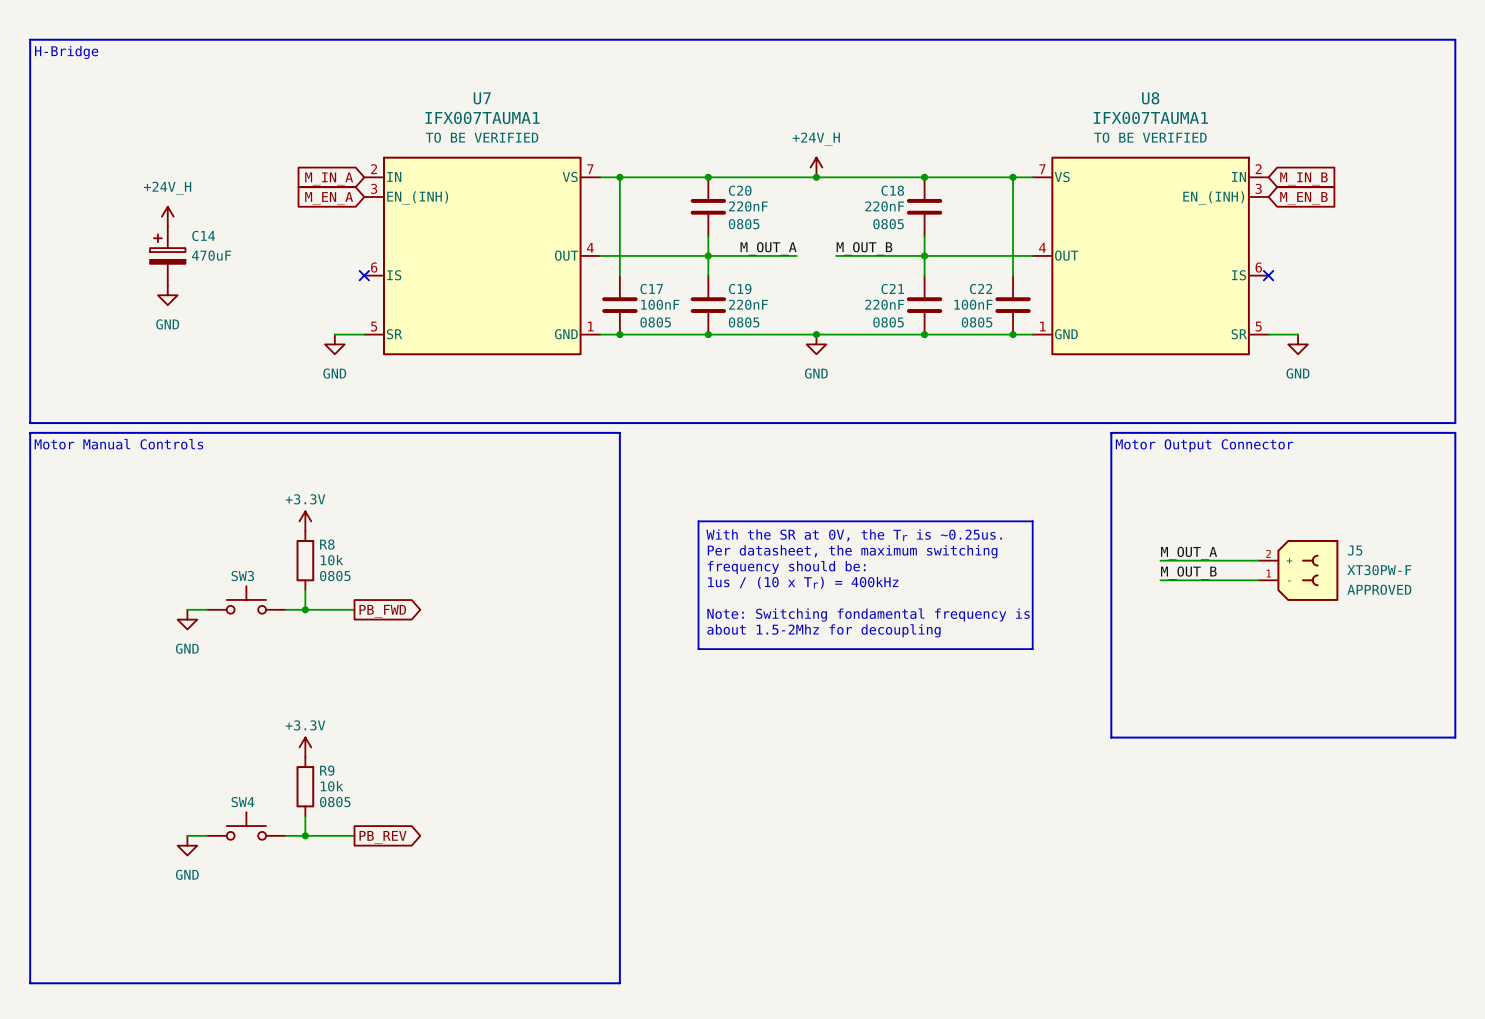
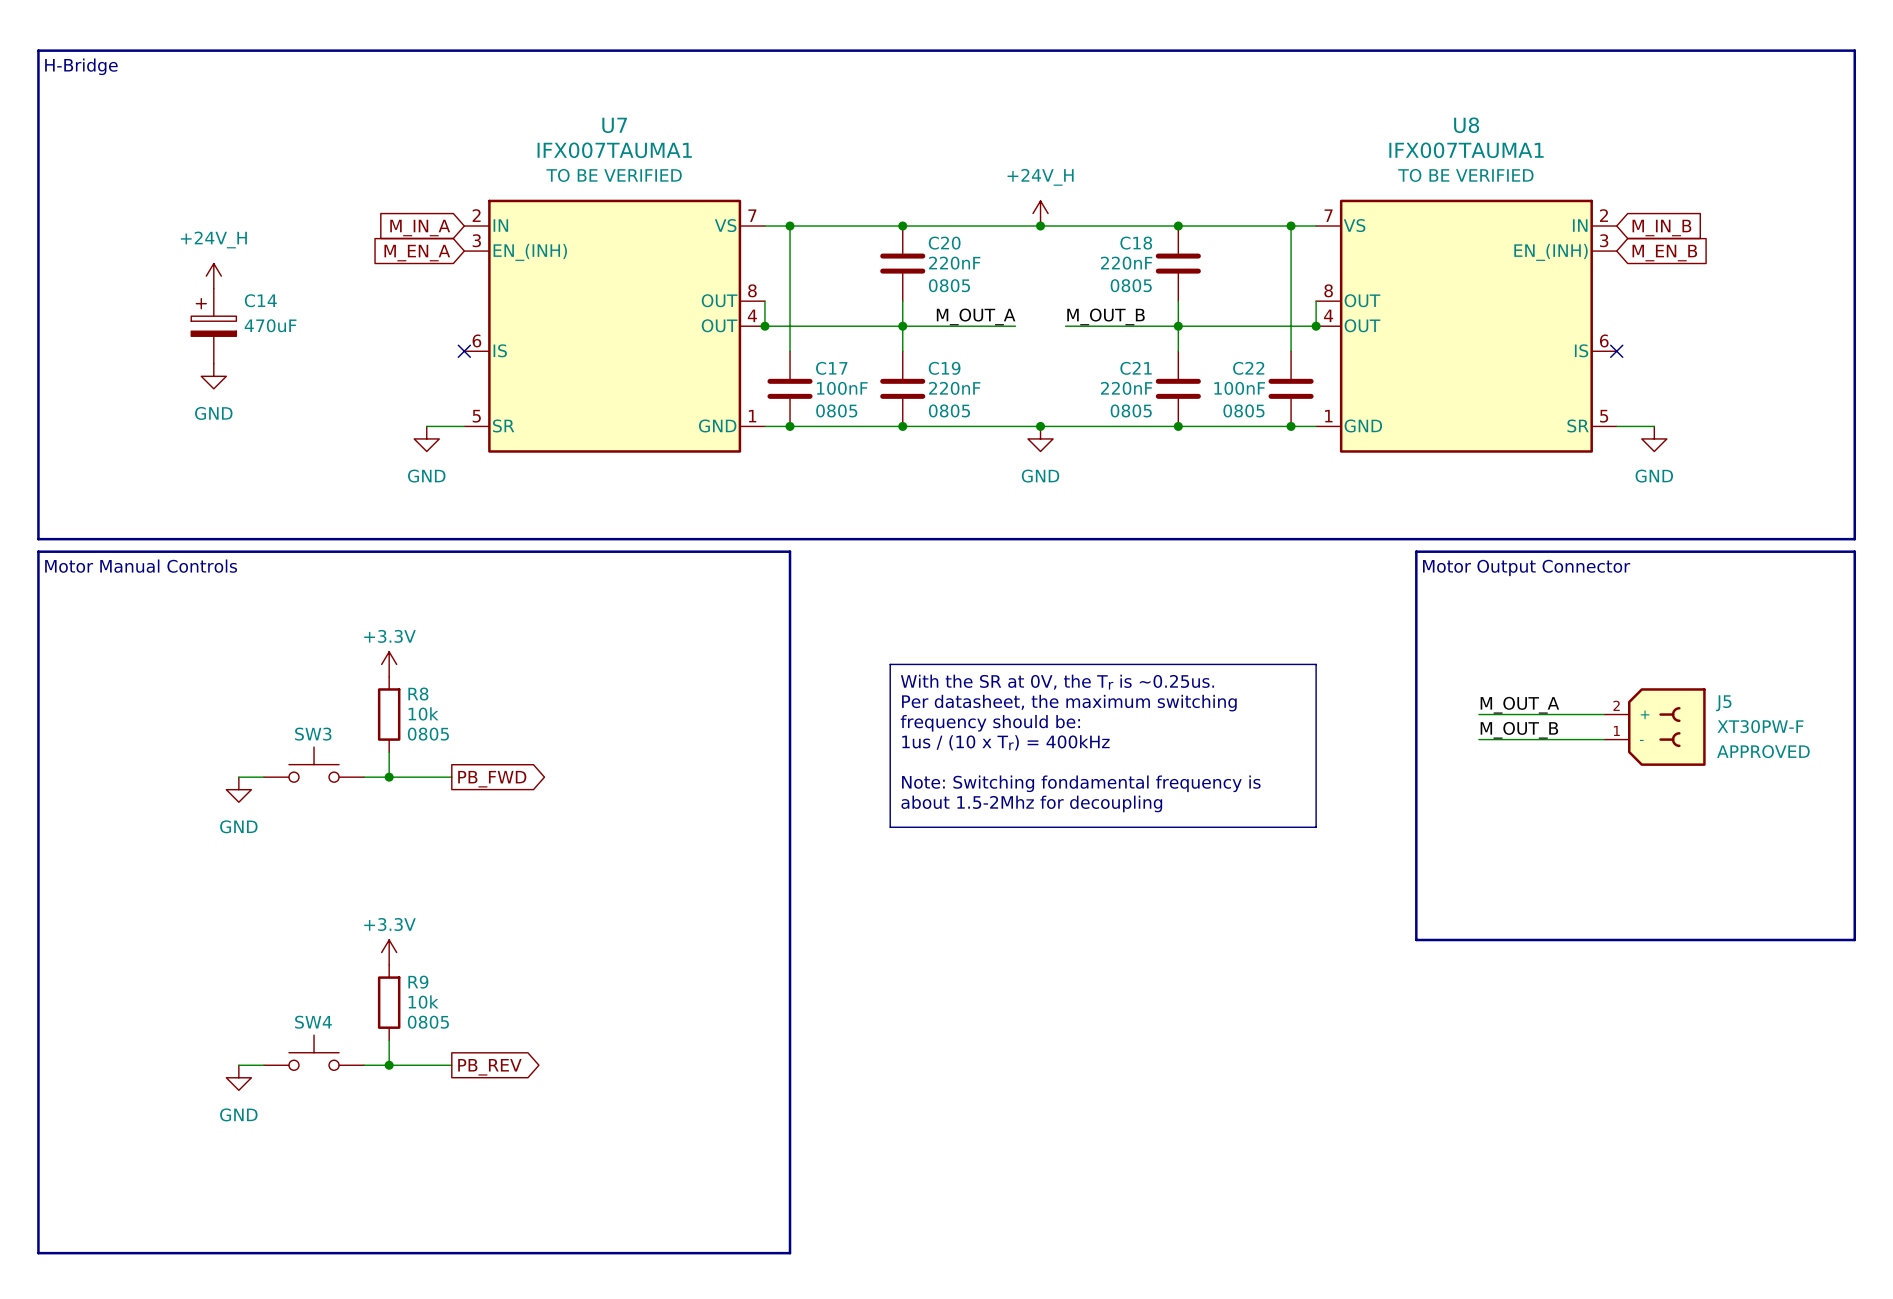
U7 symbol: [364, 156, 601, 356] -> [464, 199, 765, 453]
U8 symbol: [1032, 156, 1269, 356] -> [1316, 199, 1617, 453]
wire: none -> (764, 301) (764, 326)
wire: none -> (1316, 301) (1316, 326)
junction: none -> (764, 326)
junction: none -> (1316, 326)

